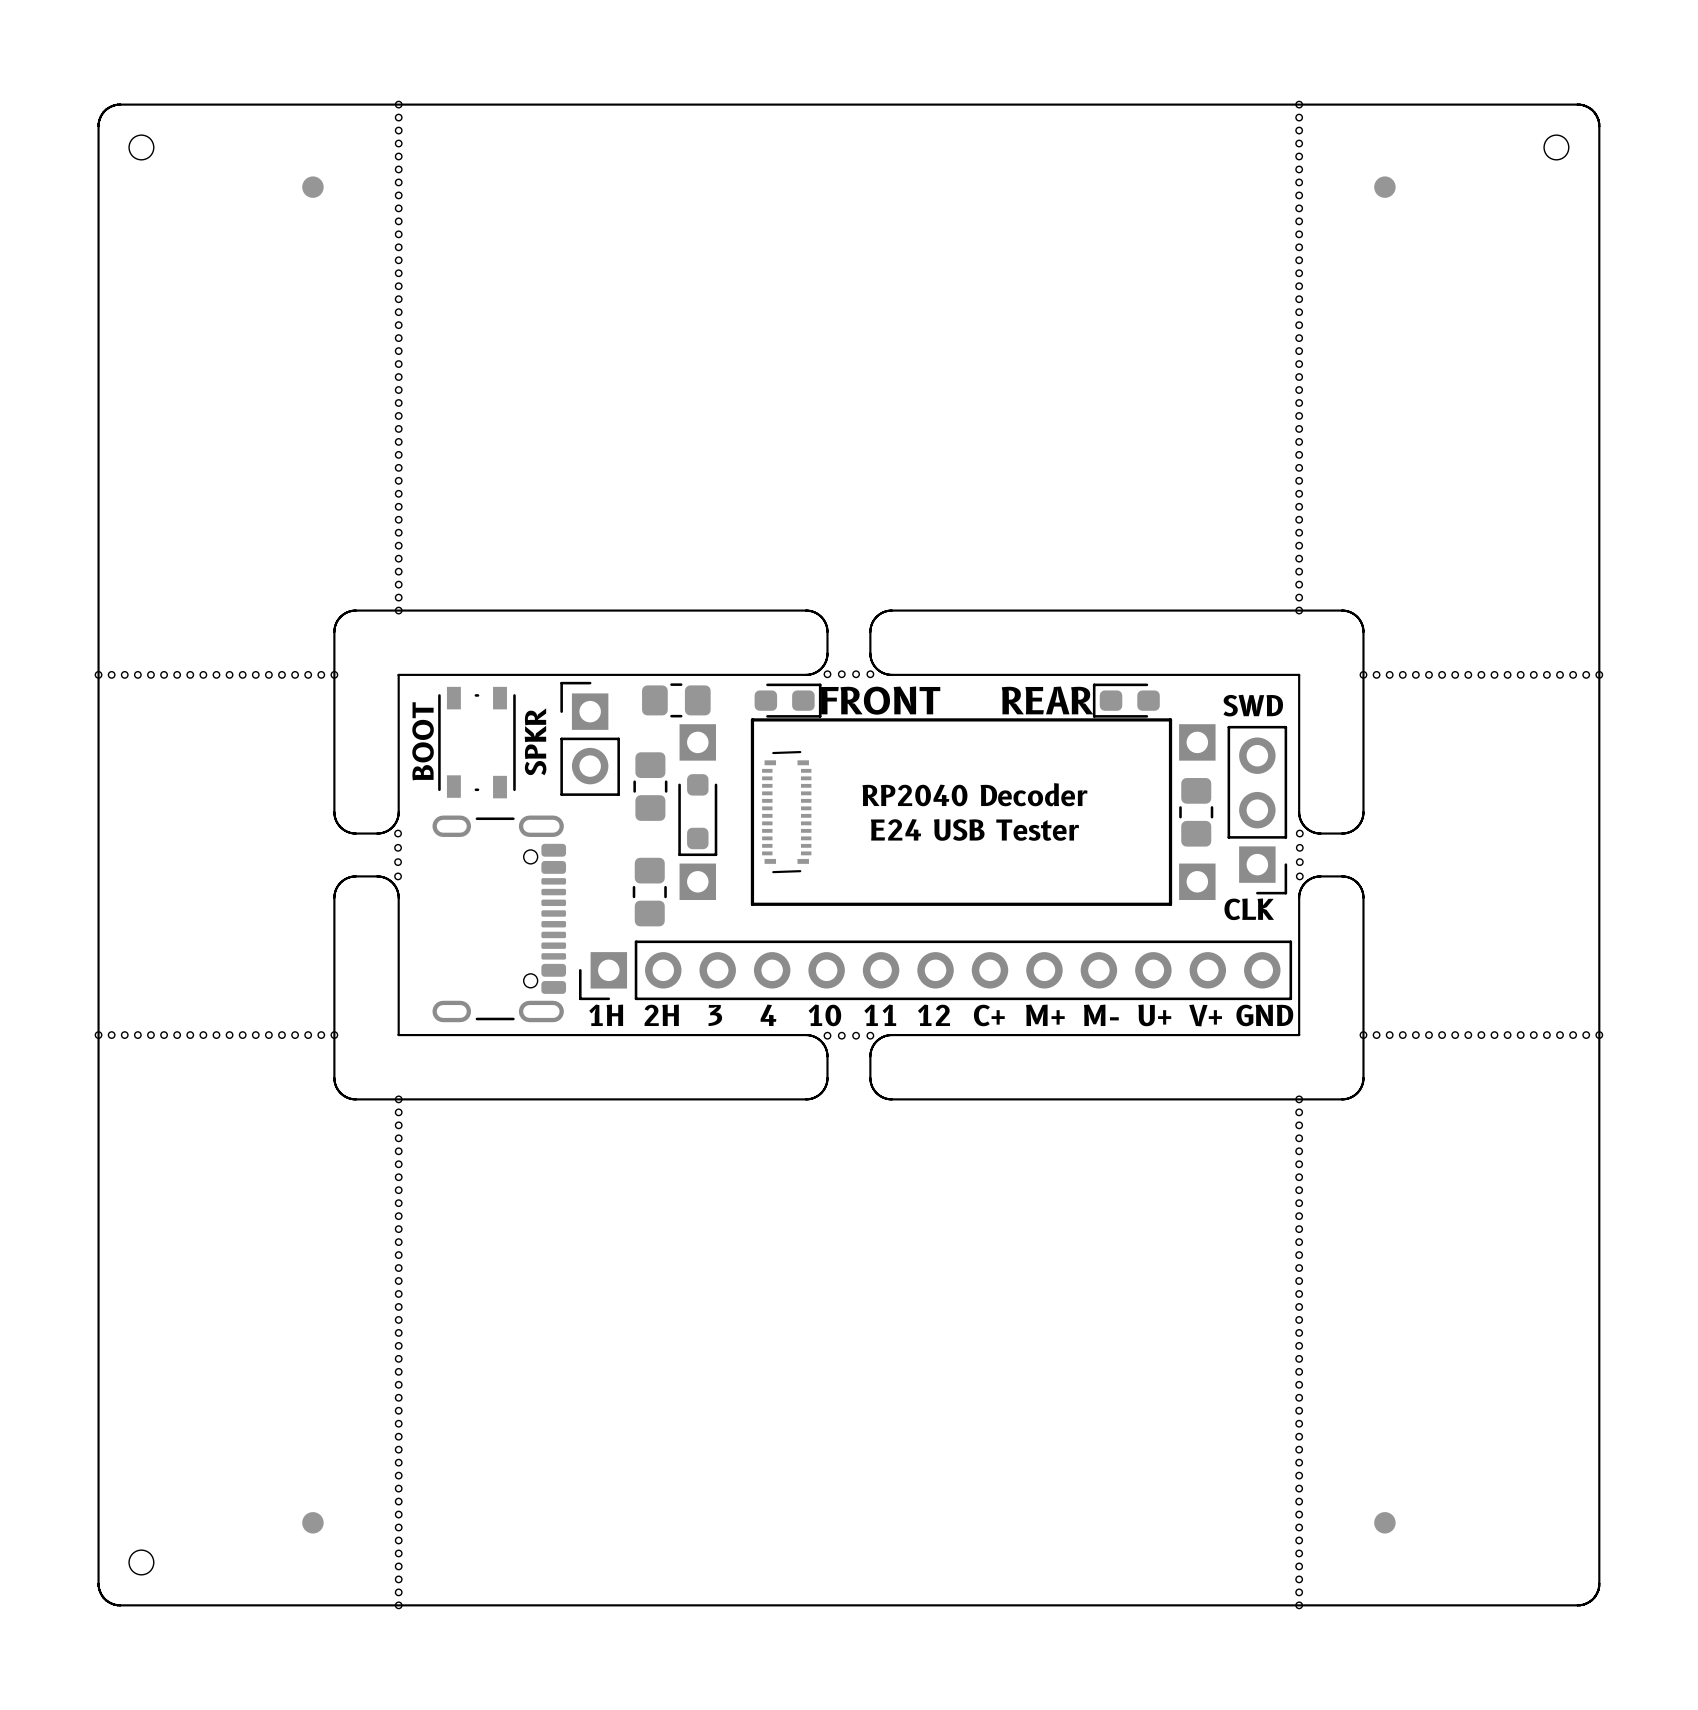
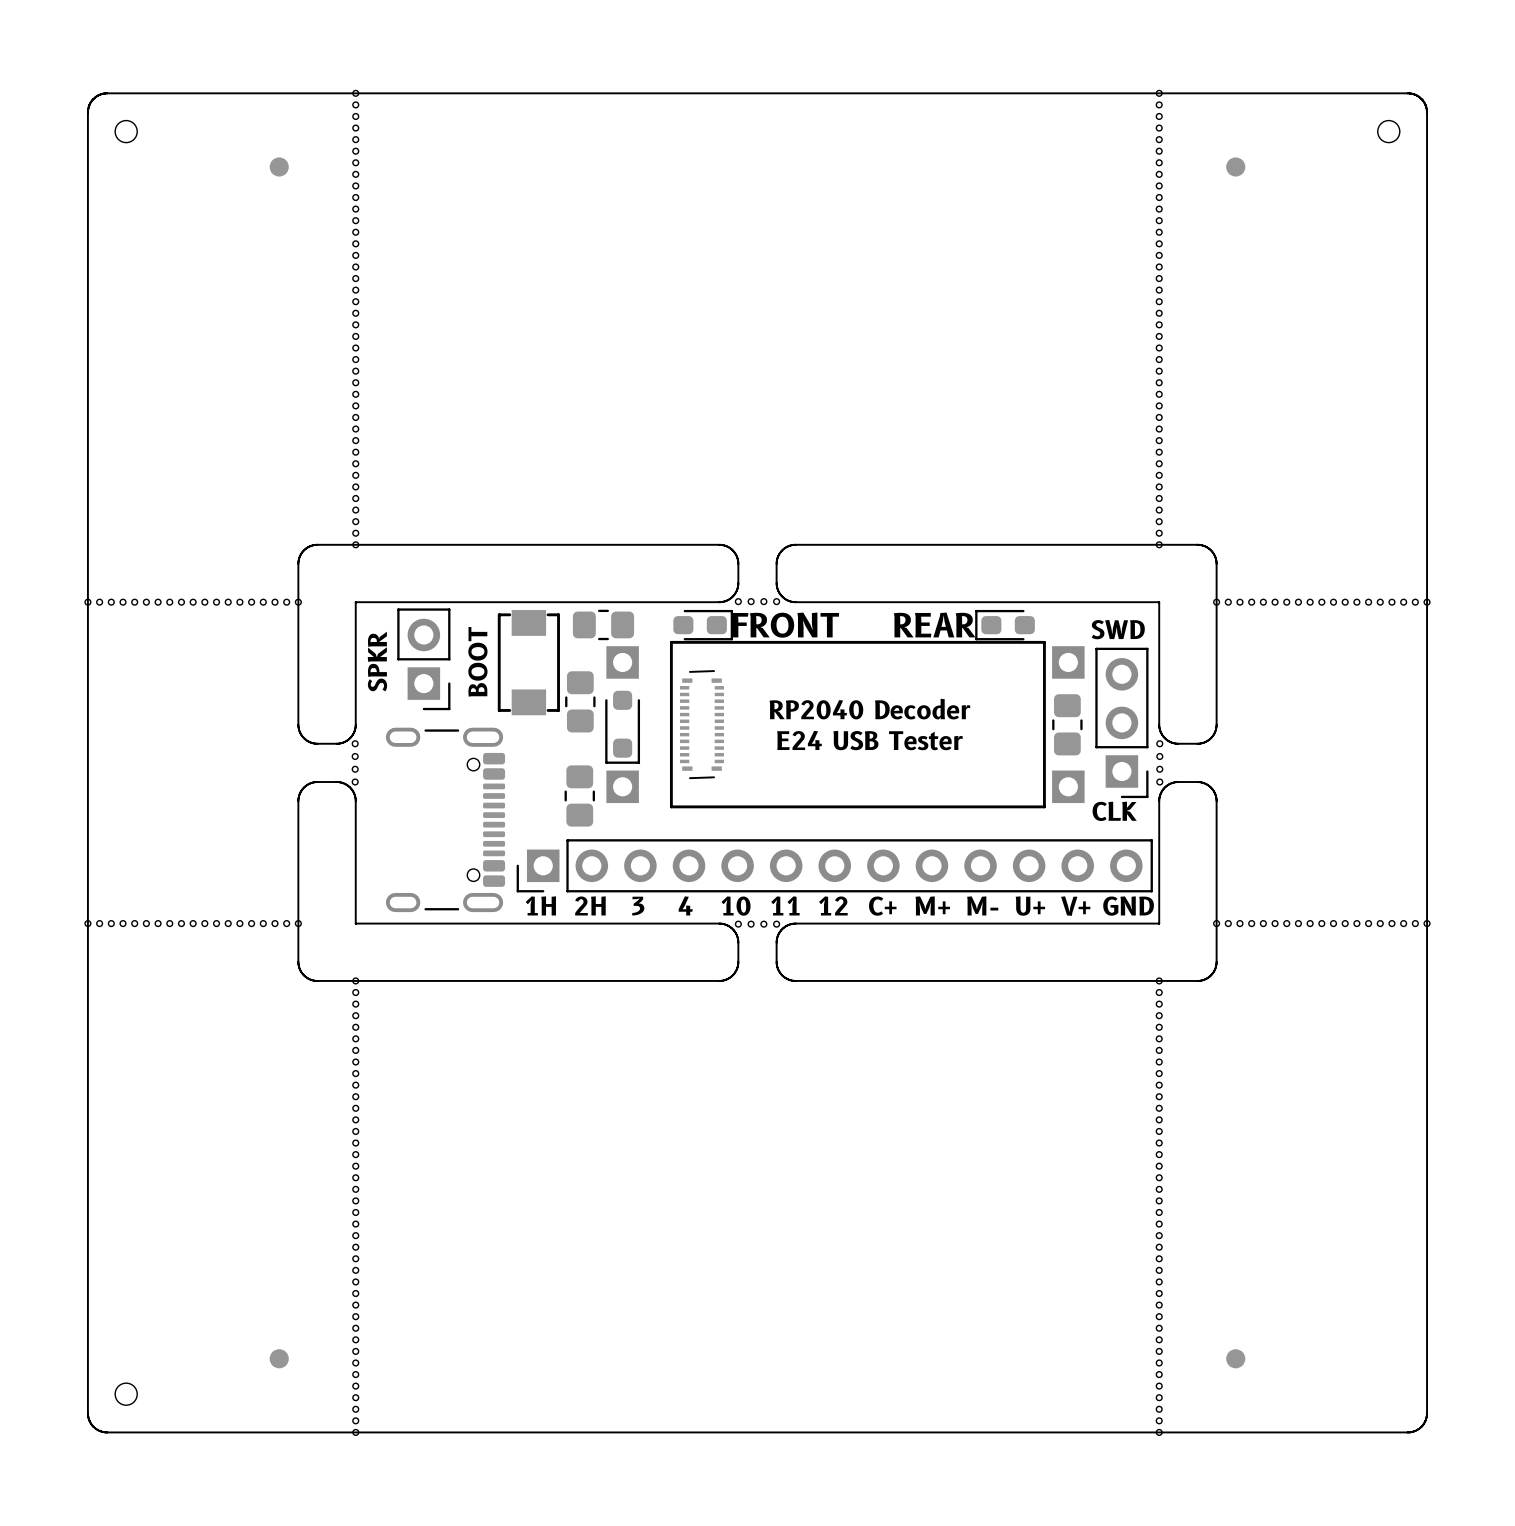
part footprint: [560, 681, 620, 796] -> [497, 610, 560, 716]
part footprint: [438, 686, 516, 799] -> [397, 608, 451, 711]
text: BOOT (423, 741) -> SPKR (377, 661)
text: SPKR (535, 741) -> BOOT (477, 661)

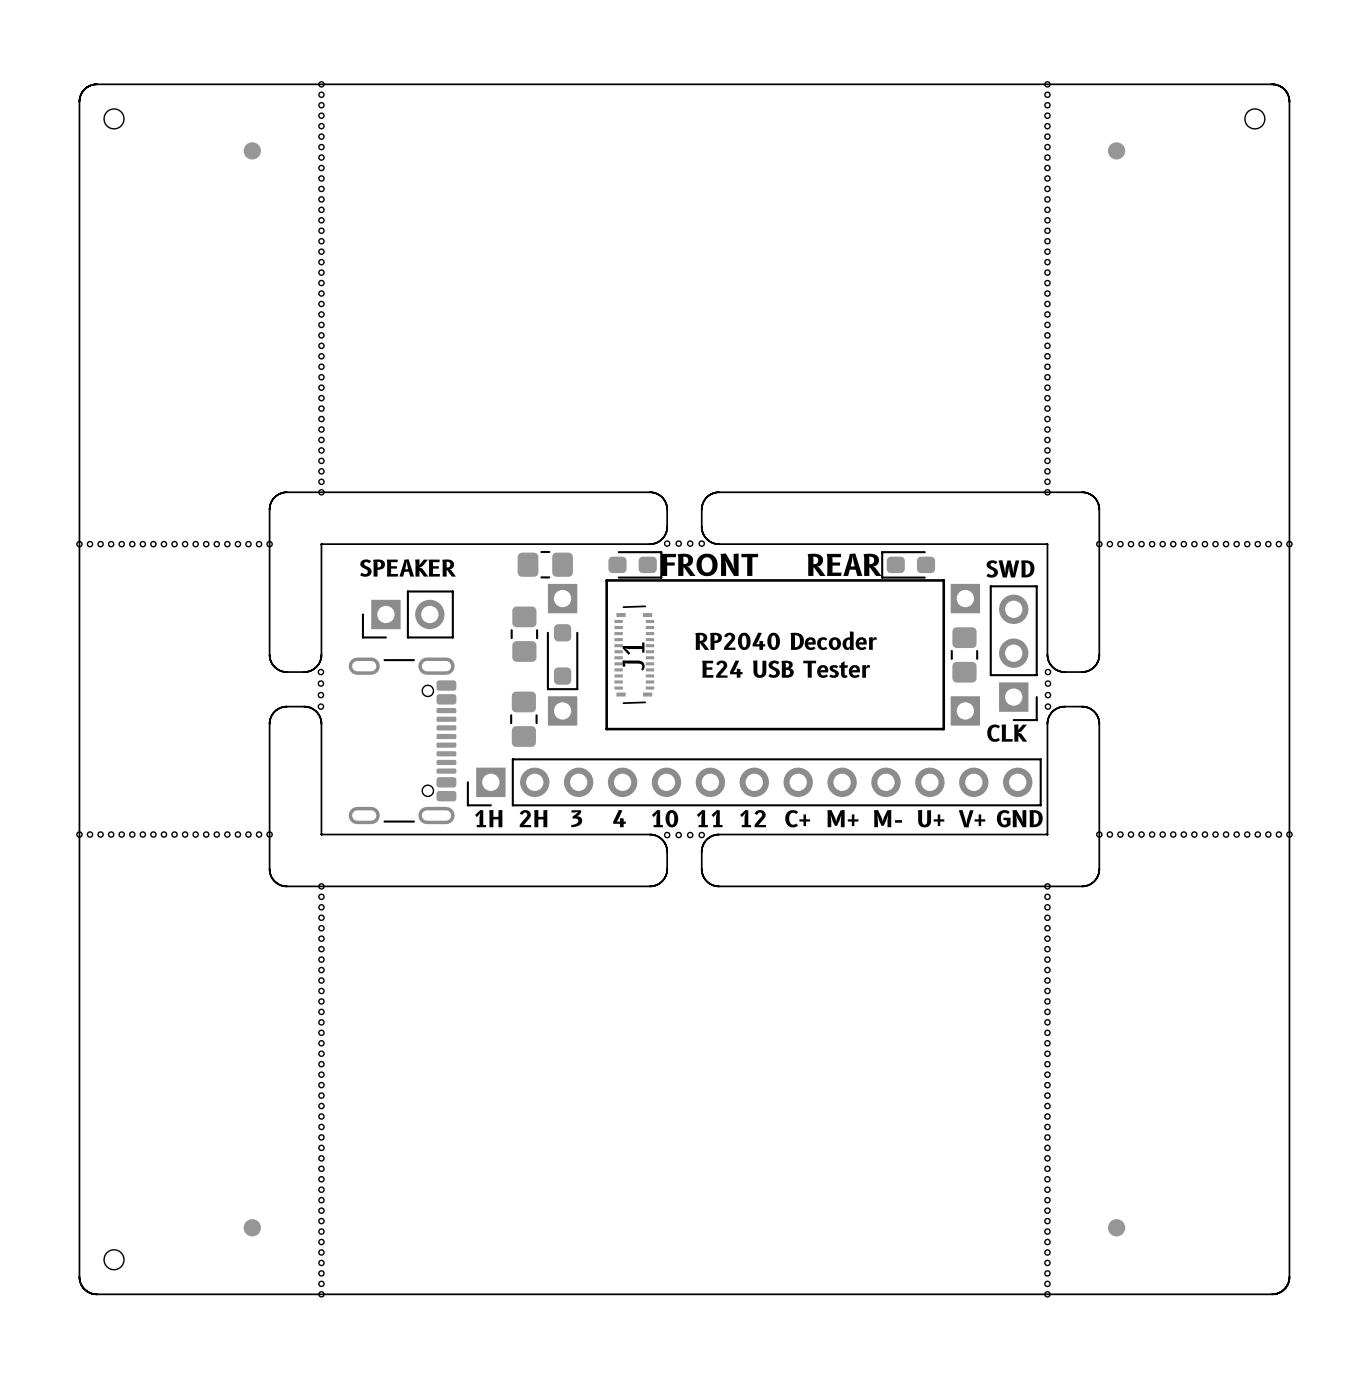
part rotation: 0° (423, 659) -> 90° clockwise (407, 614)
text: SPKR (377, 661) -> SPEAKER (408, 568)
text: BOOT (477, 661) -> none
part: (528, 662) -> none
J1 name: none -> J1 (633, 656)

